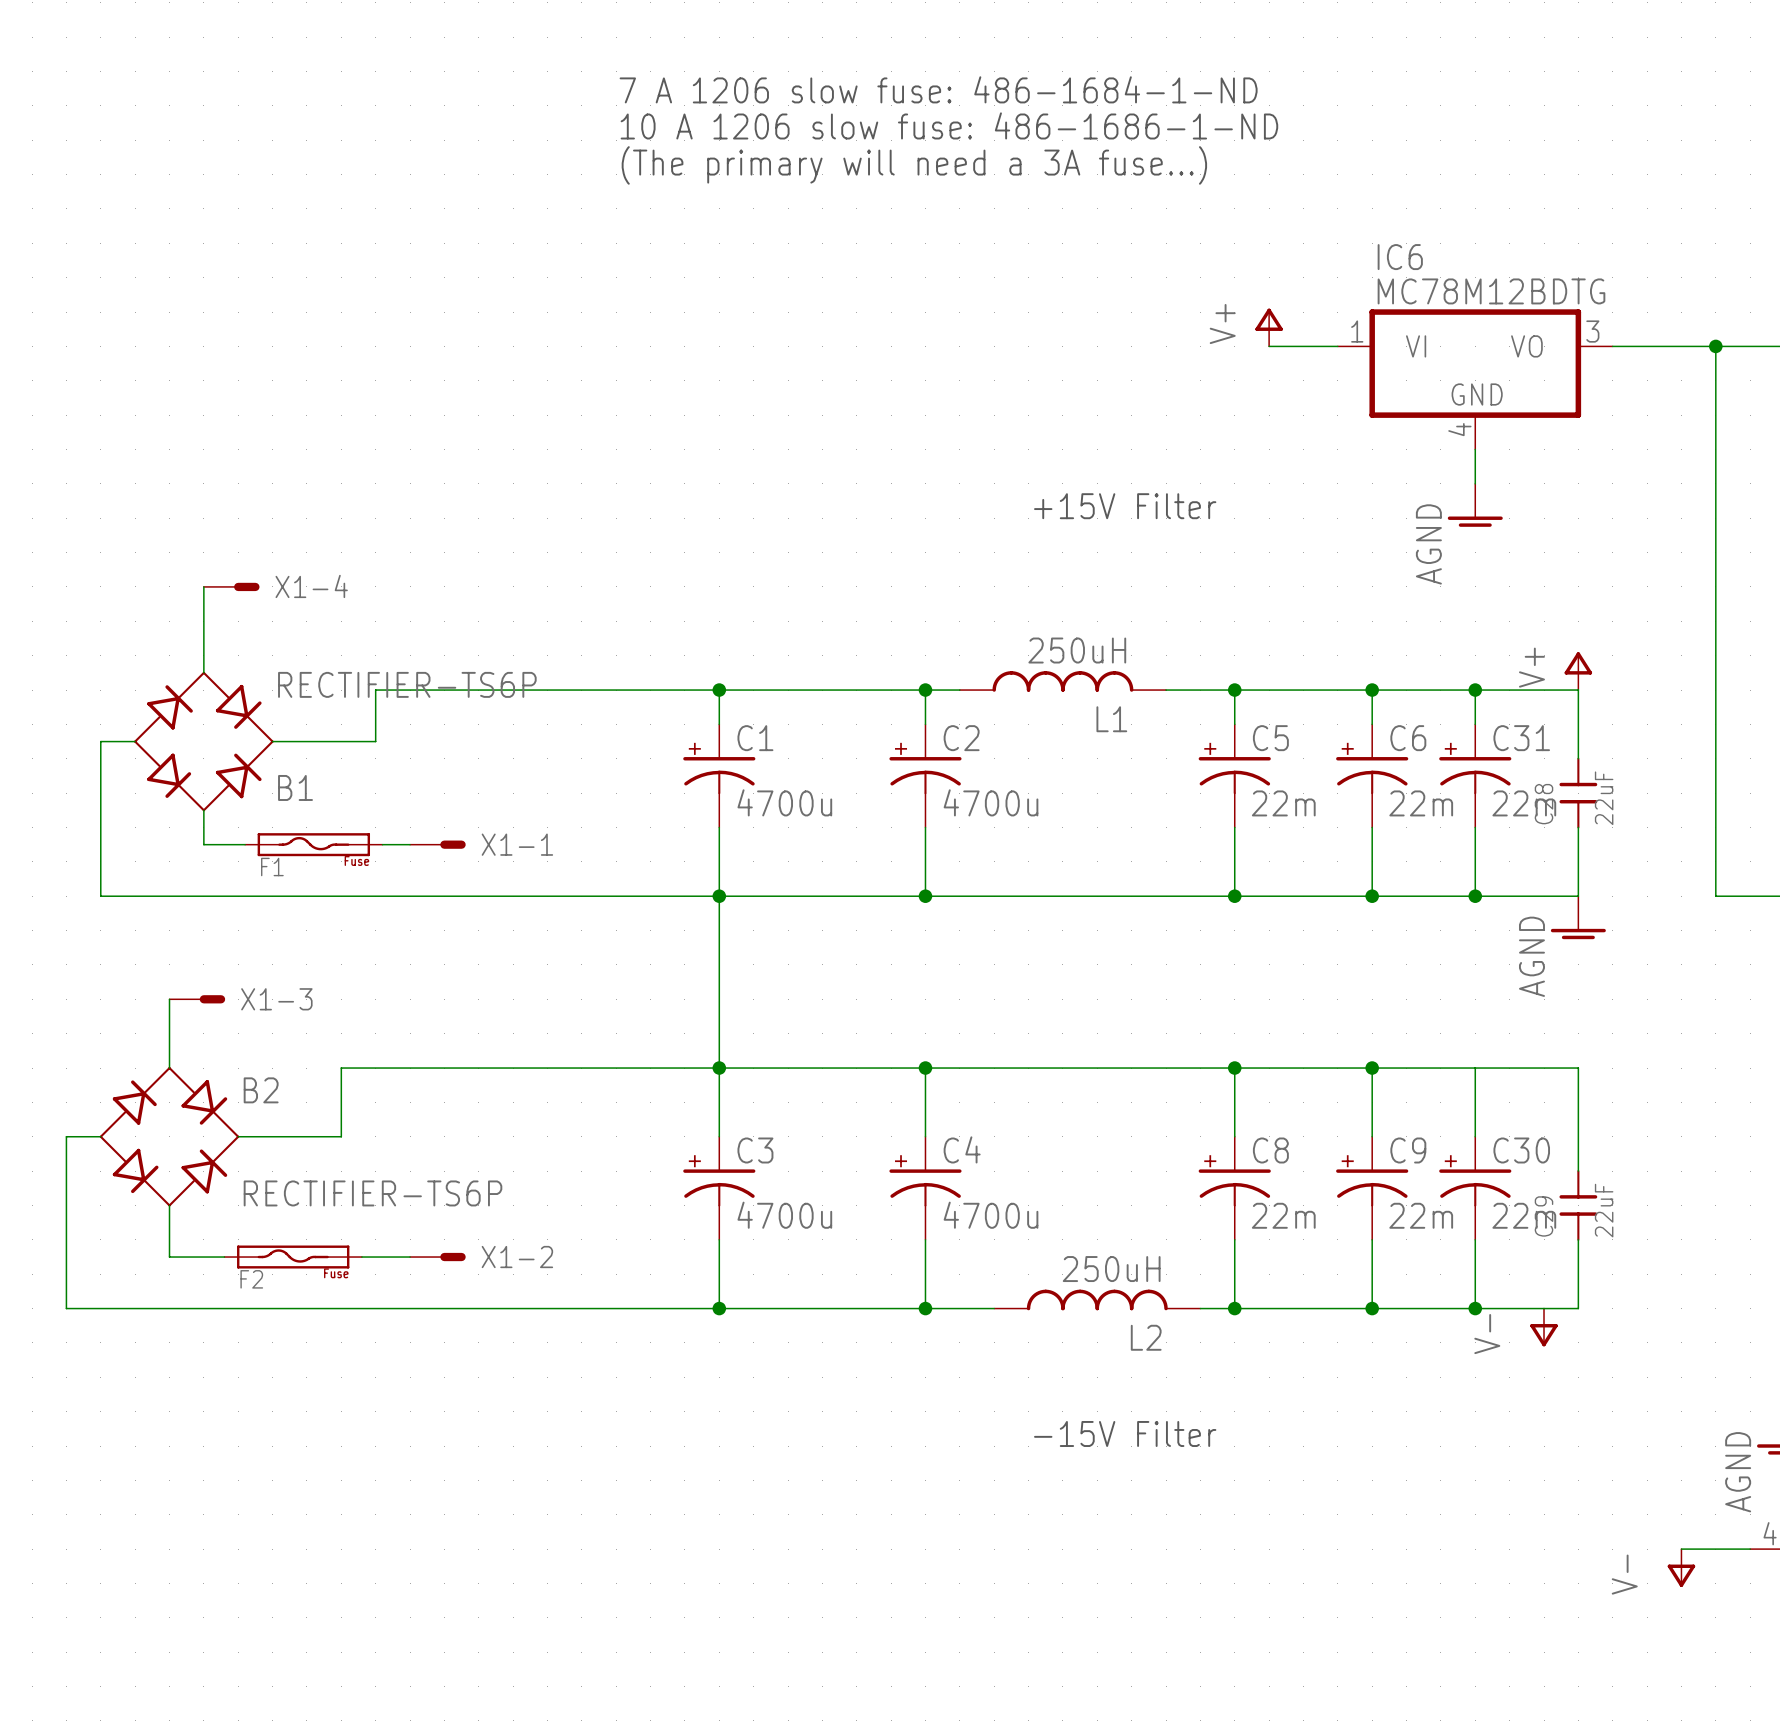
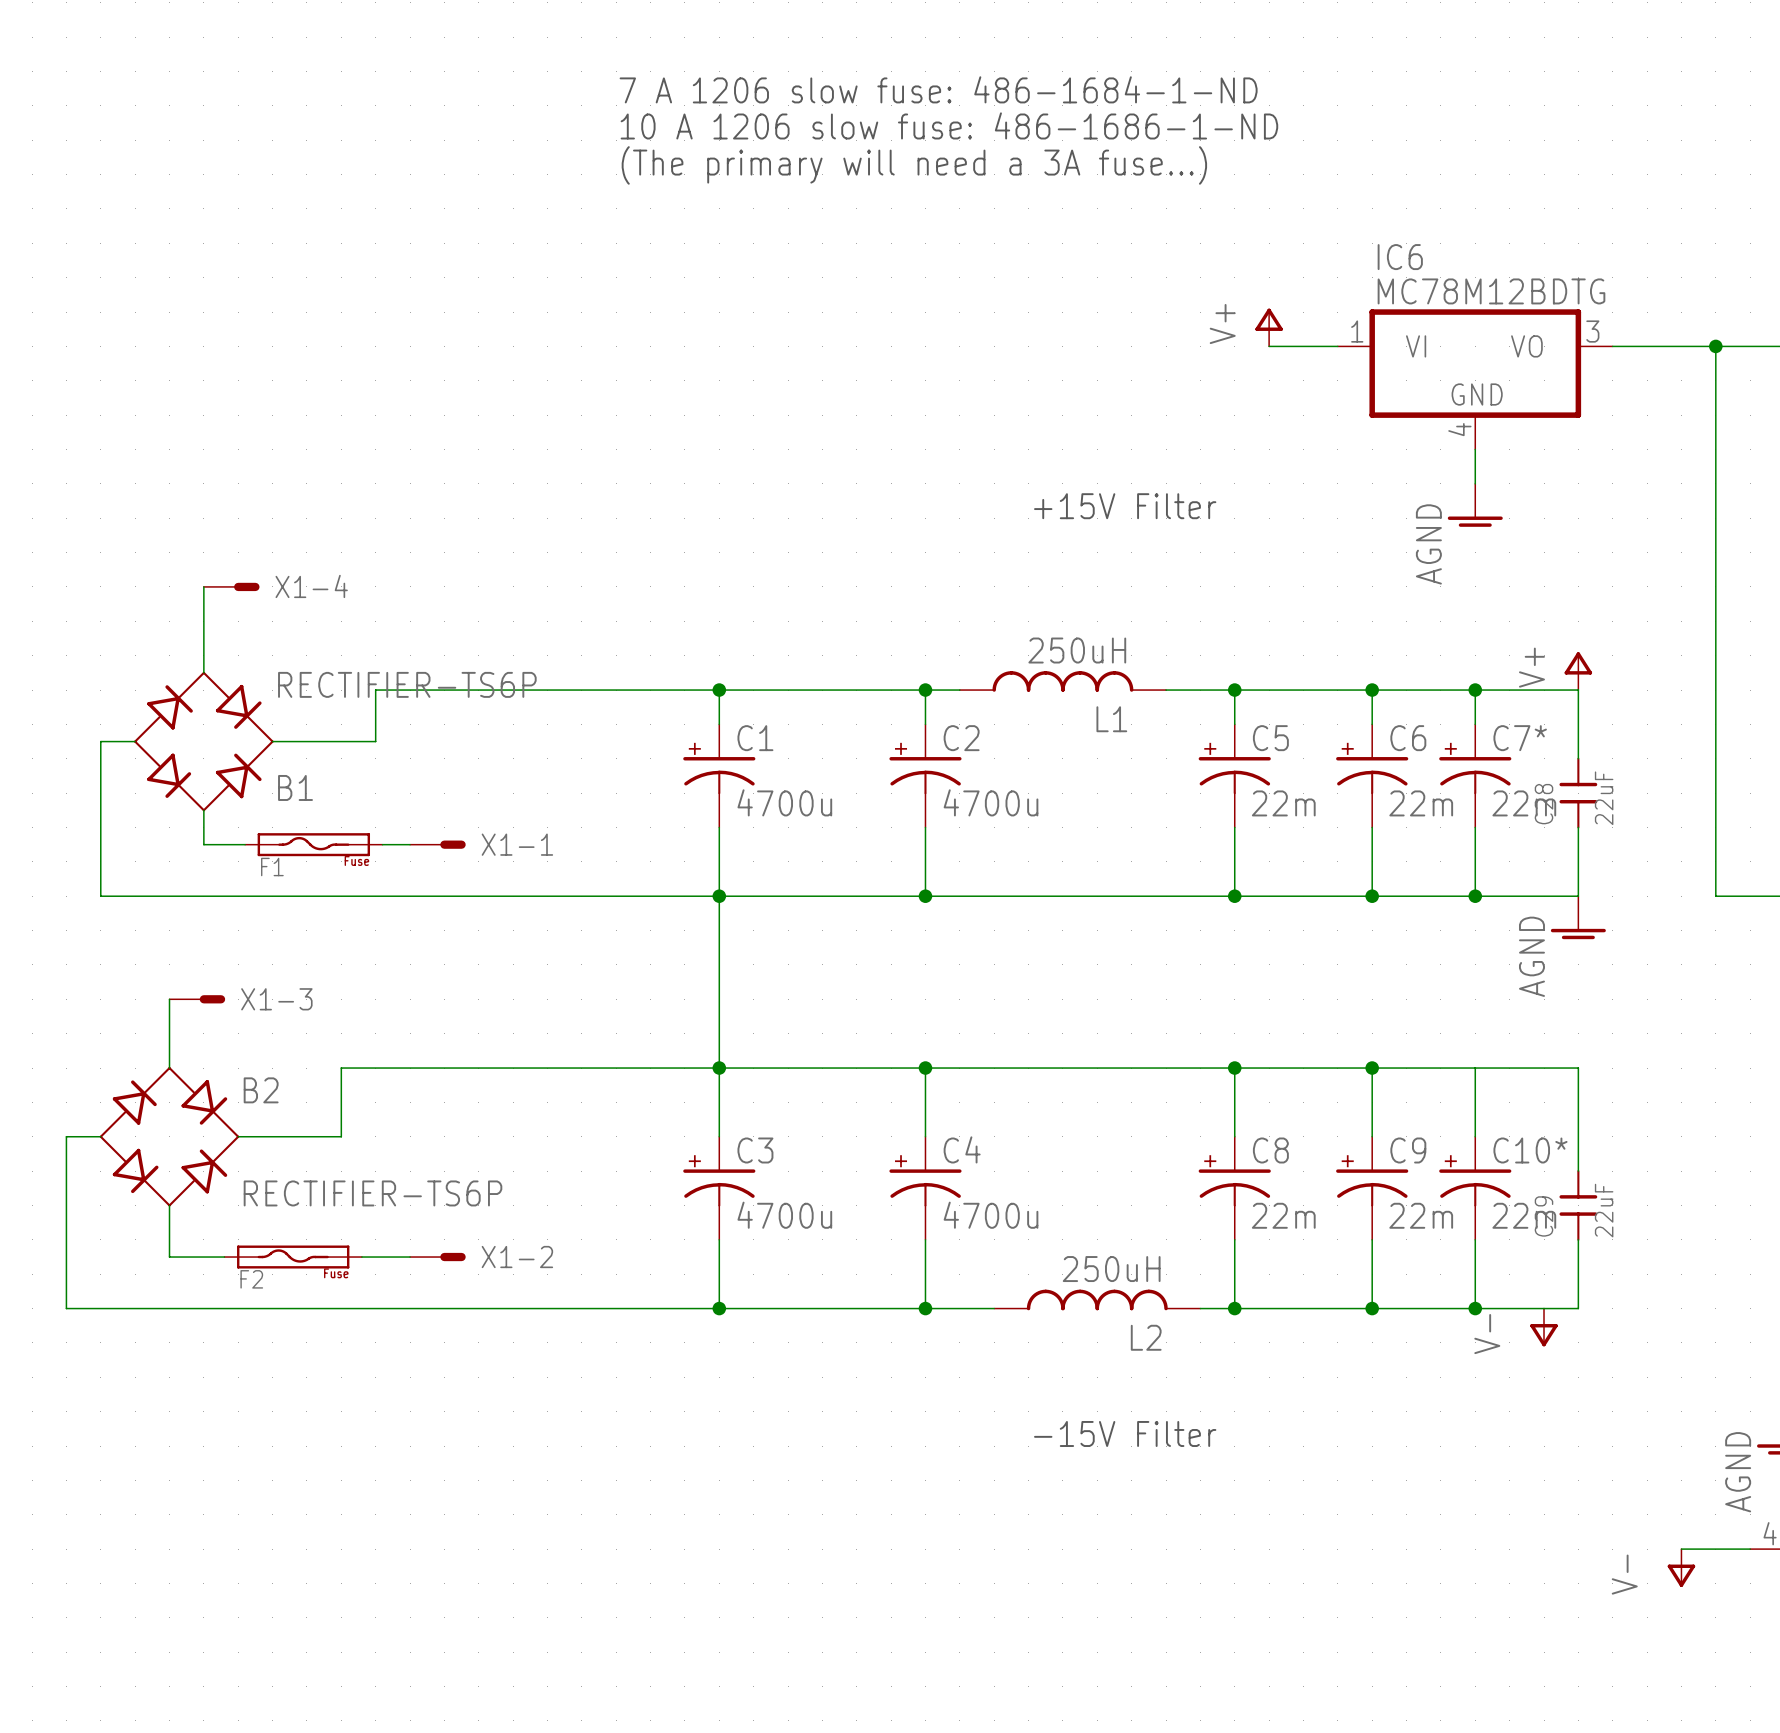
C31 name: C31 (1521, 738) -> C7* (1520, 738)
C30 name: C30 (1521, 1150) -> C10* (1530, 1150)

